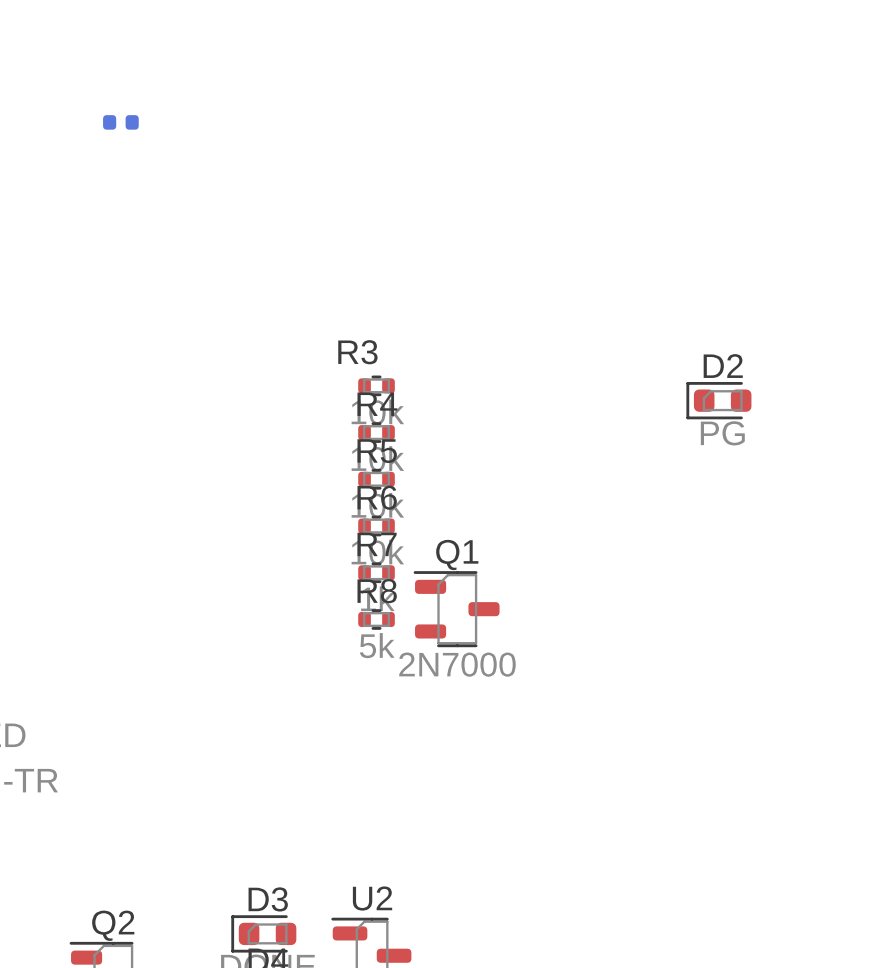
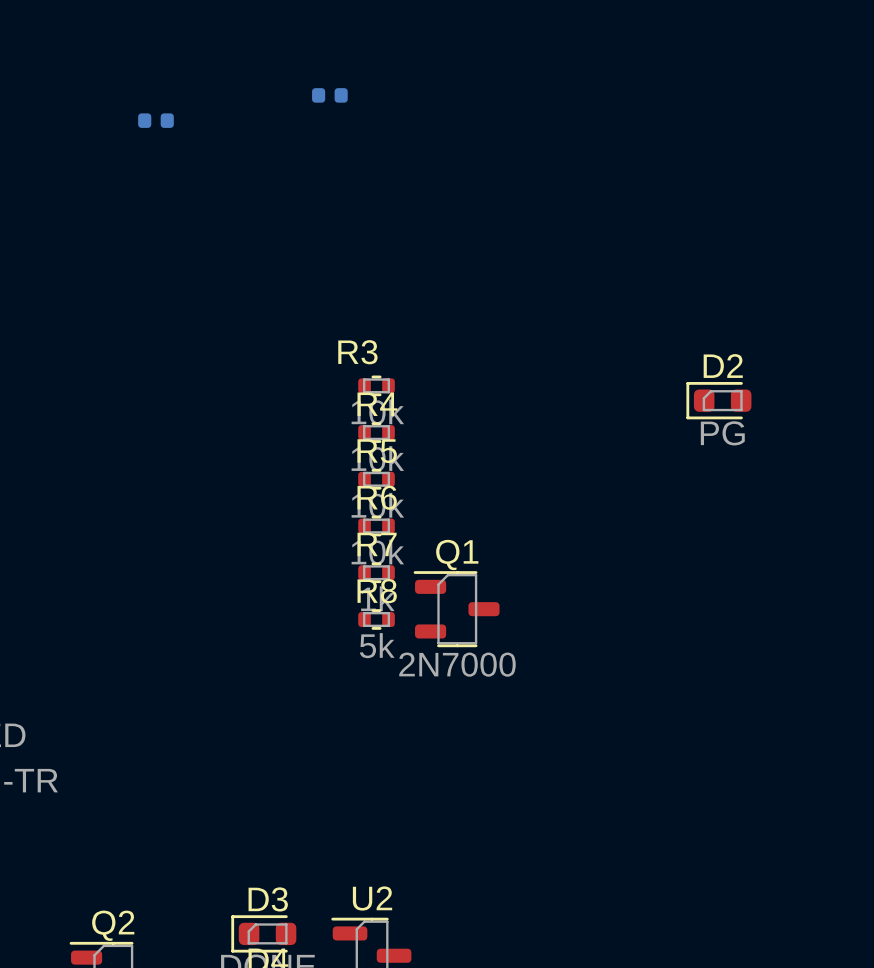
part: none -> (329, 95)
part position: (120, 122) -> (155, 120)

